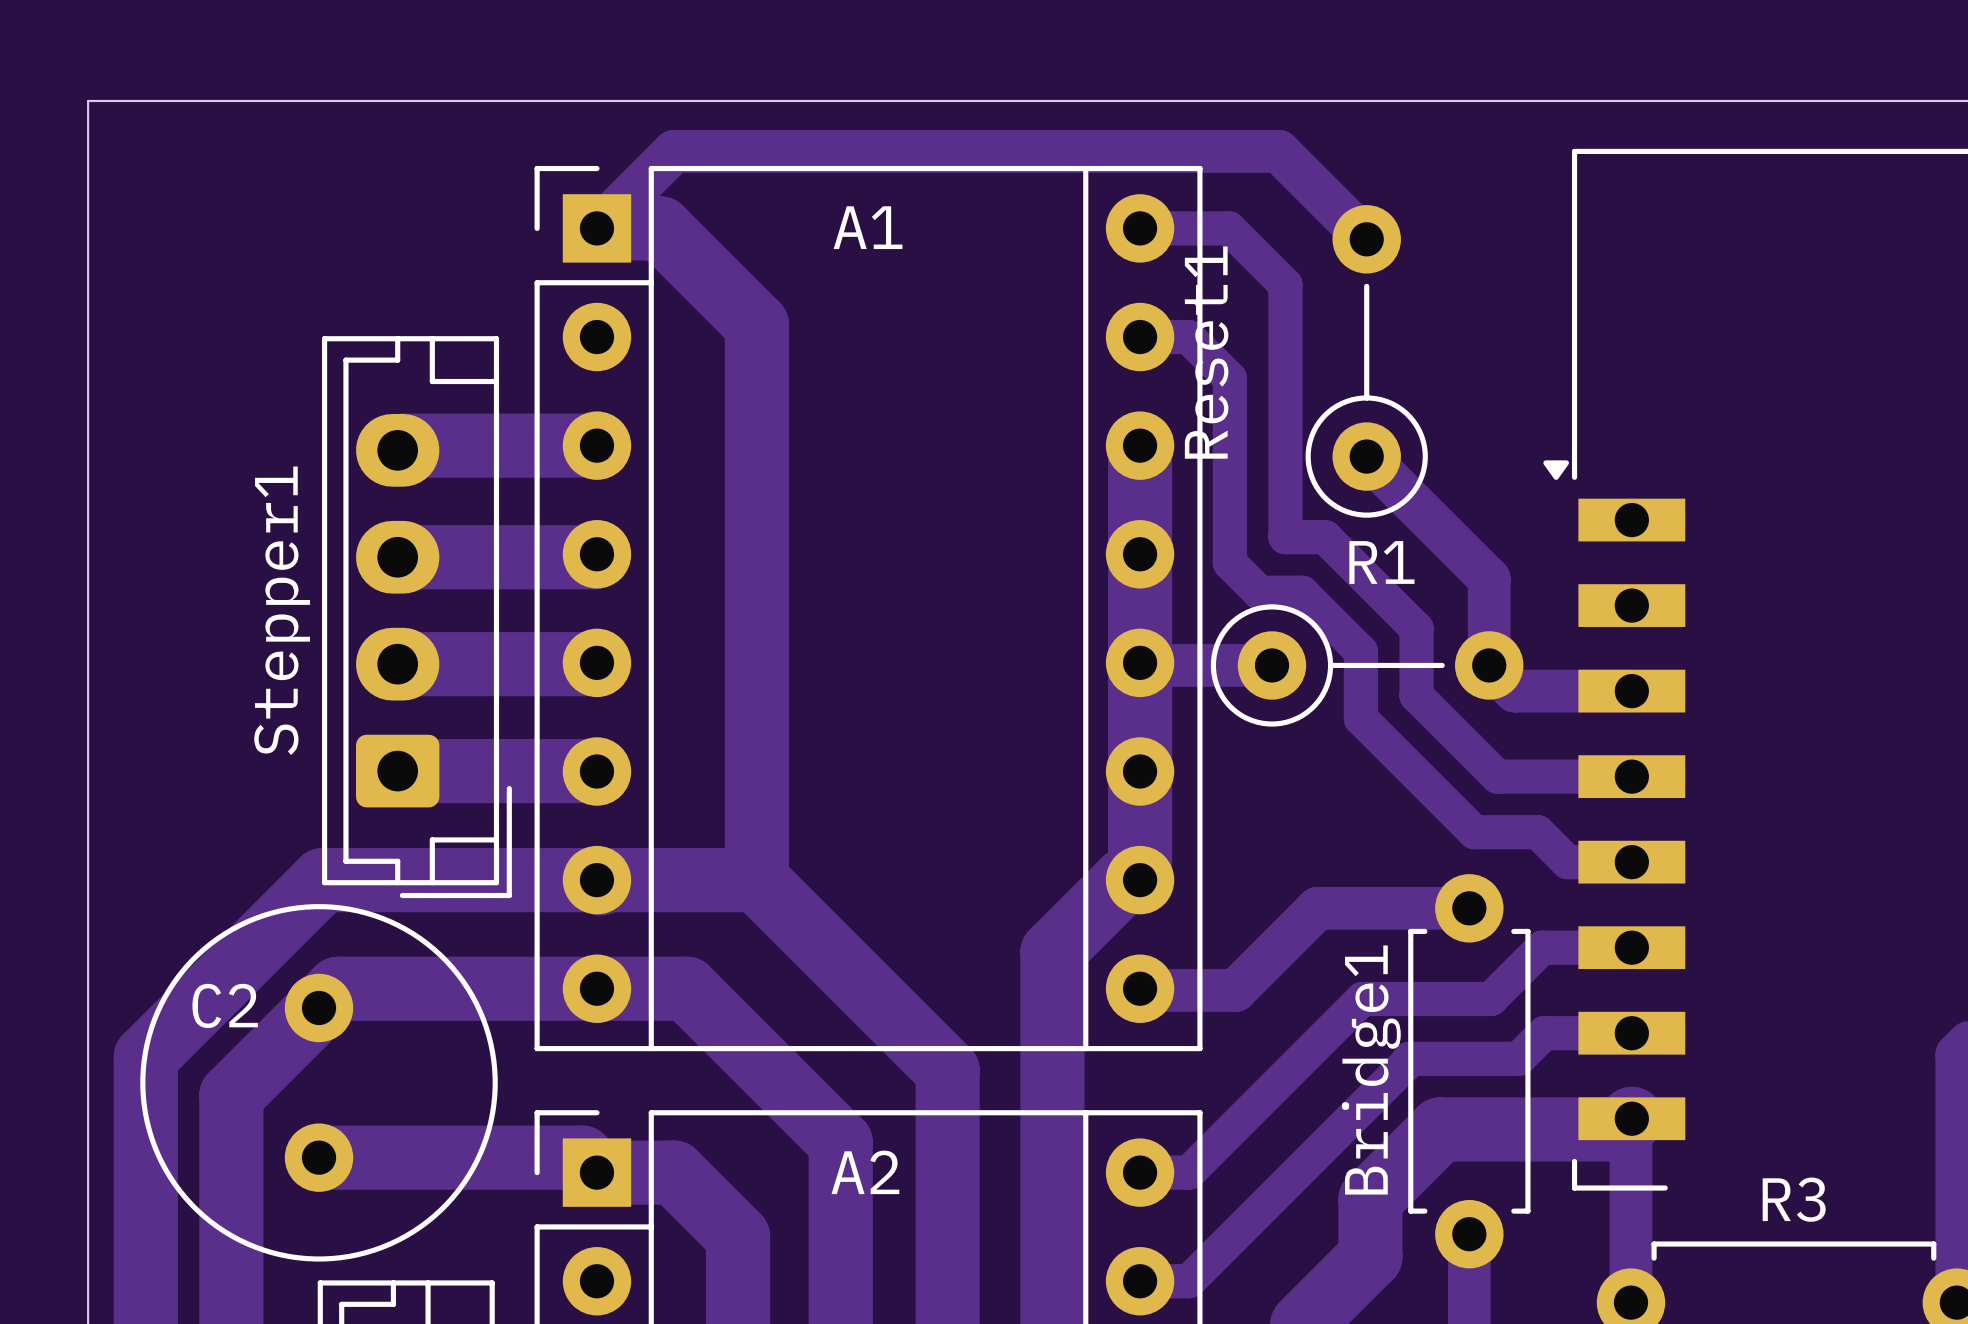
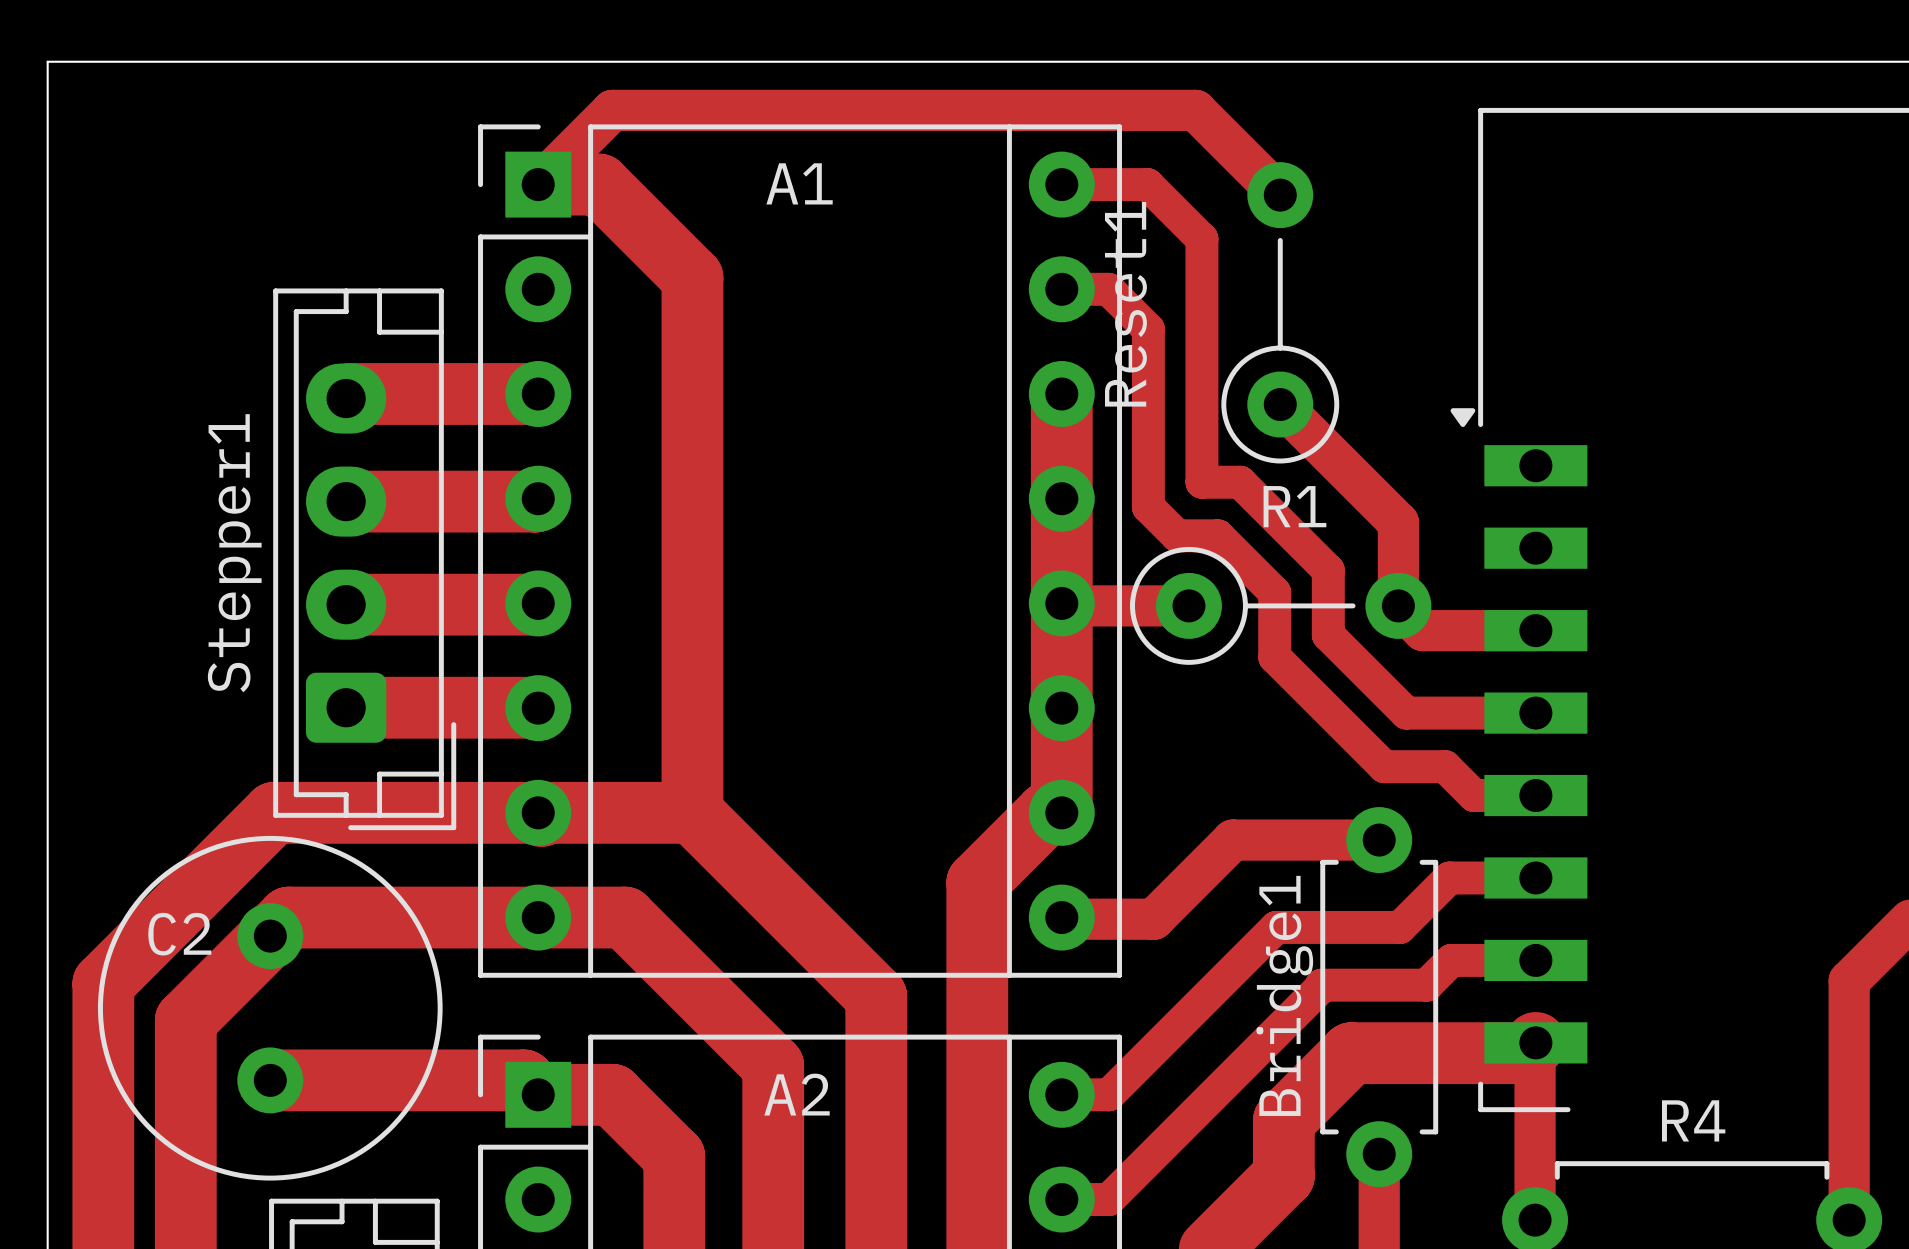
R3 name: R3 (1794, 1199) -> R4 (1693, 1120)

